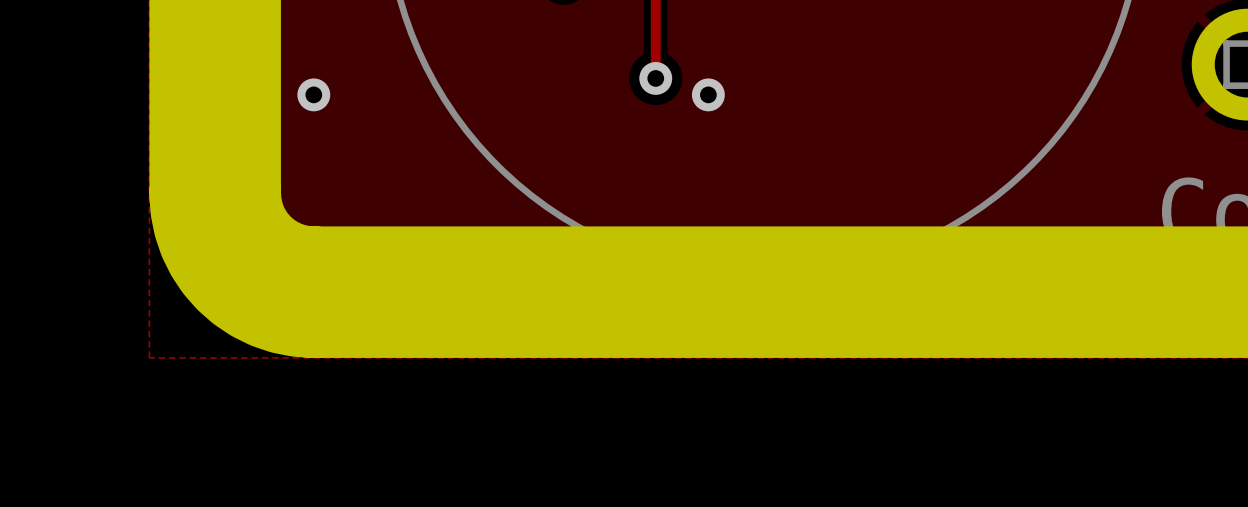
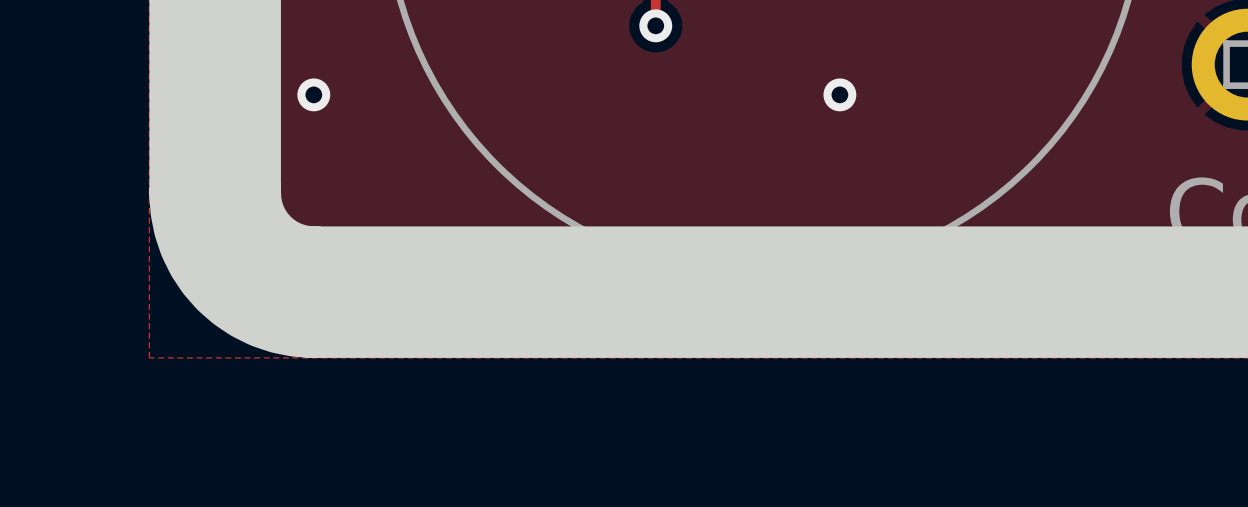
track: (655, 25) (655, 78) -> none
via: none -> (655, 25)
via: (655, 78) -> none
via: (708, 94) -> none
via: none -> (839, 94)

